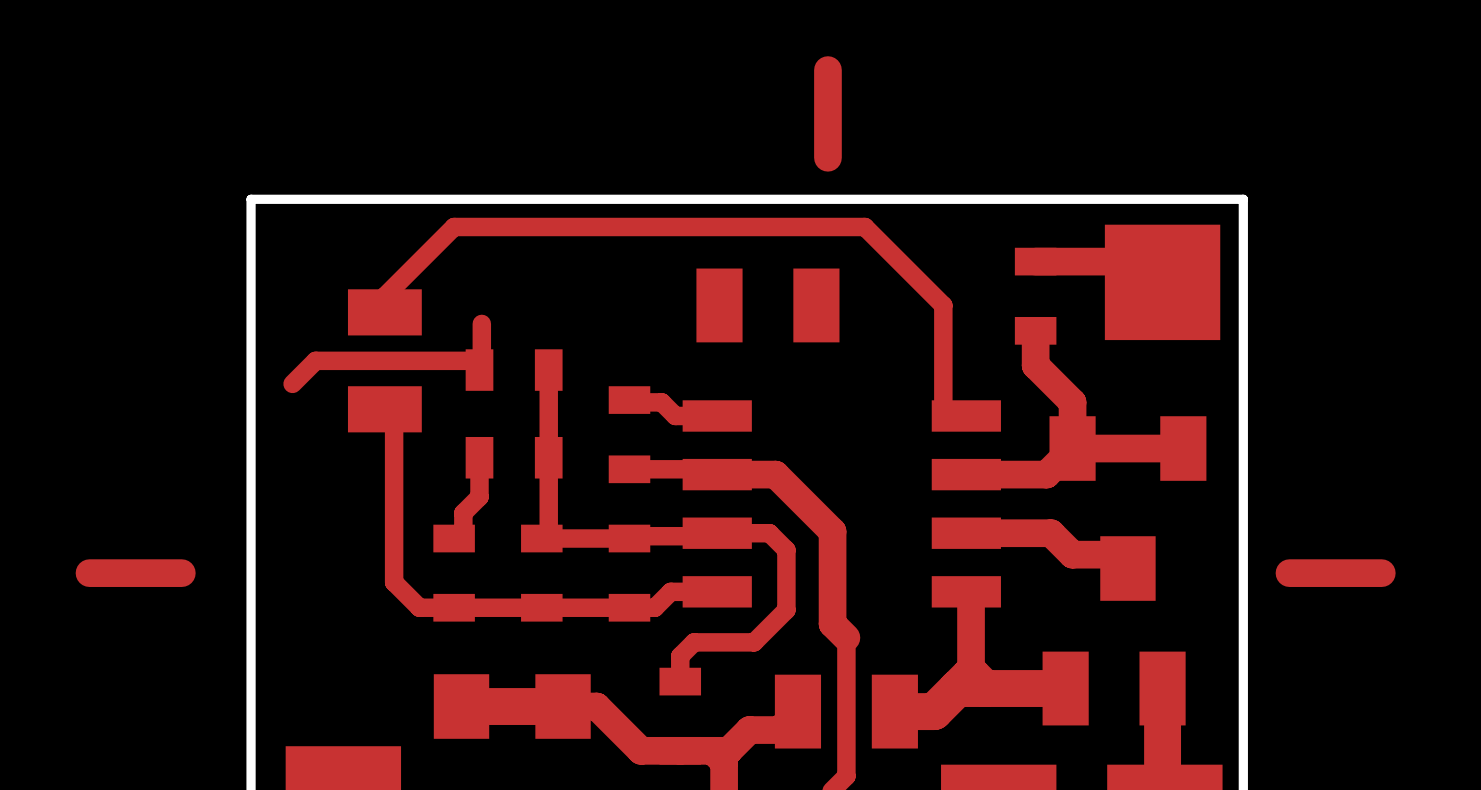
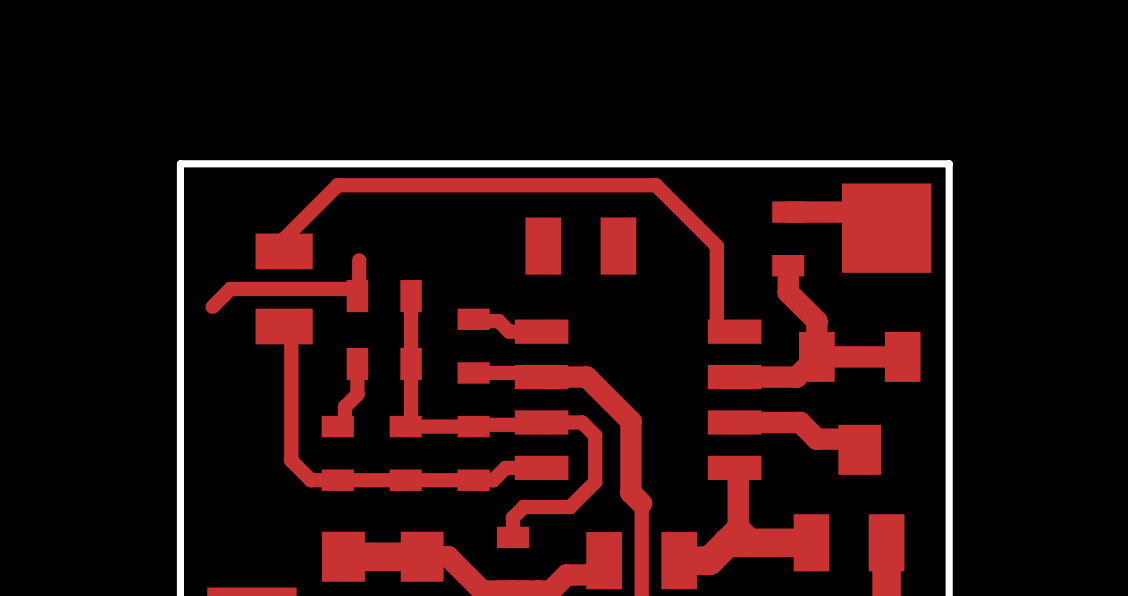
top track: (827, 70) (827, 157) -> none
top track: (181, 573) (89, 573) -> none
top track: (1381, 573) (1289, 573) -> none

